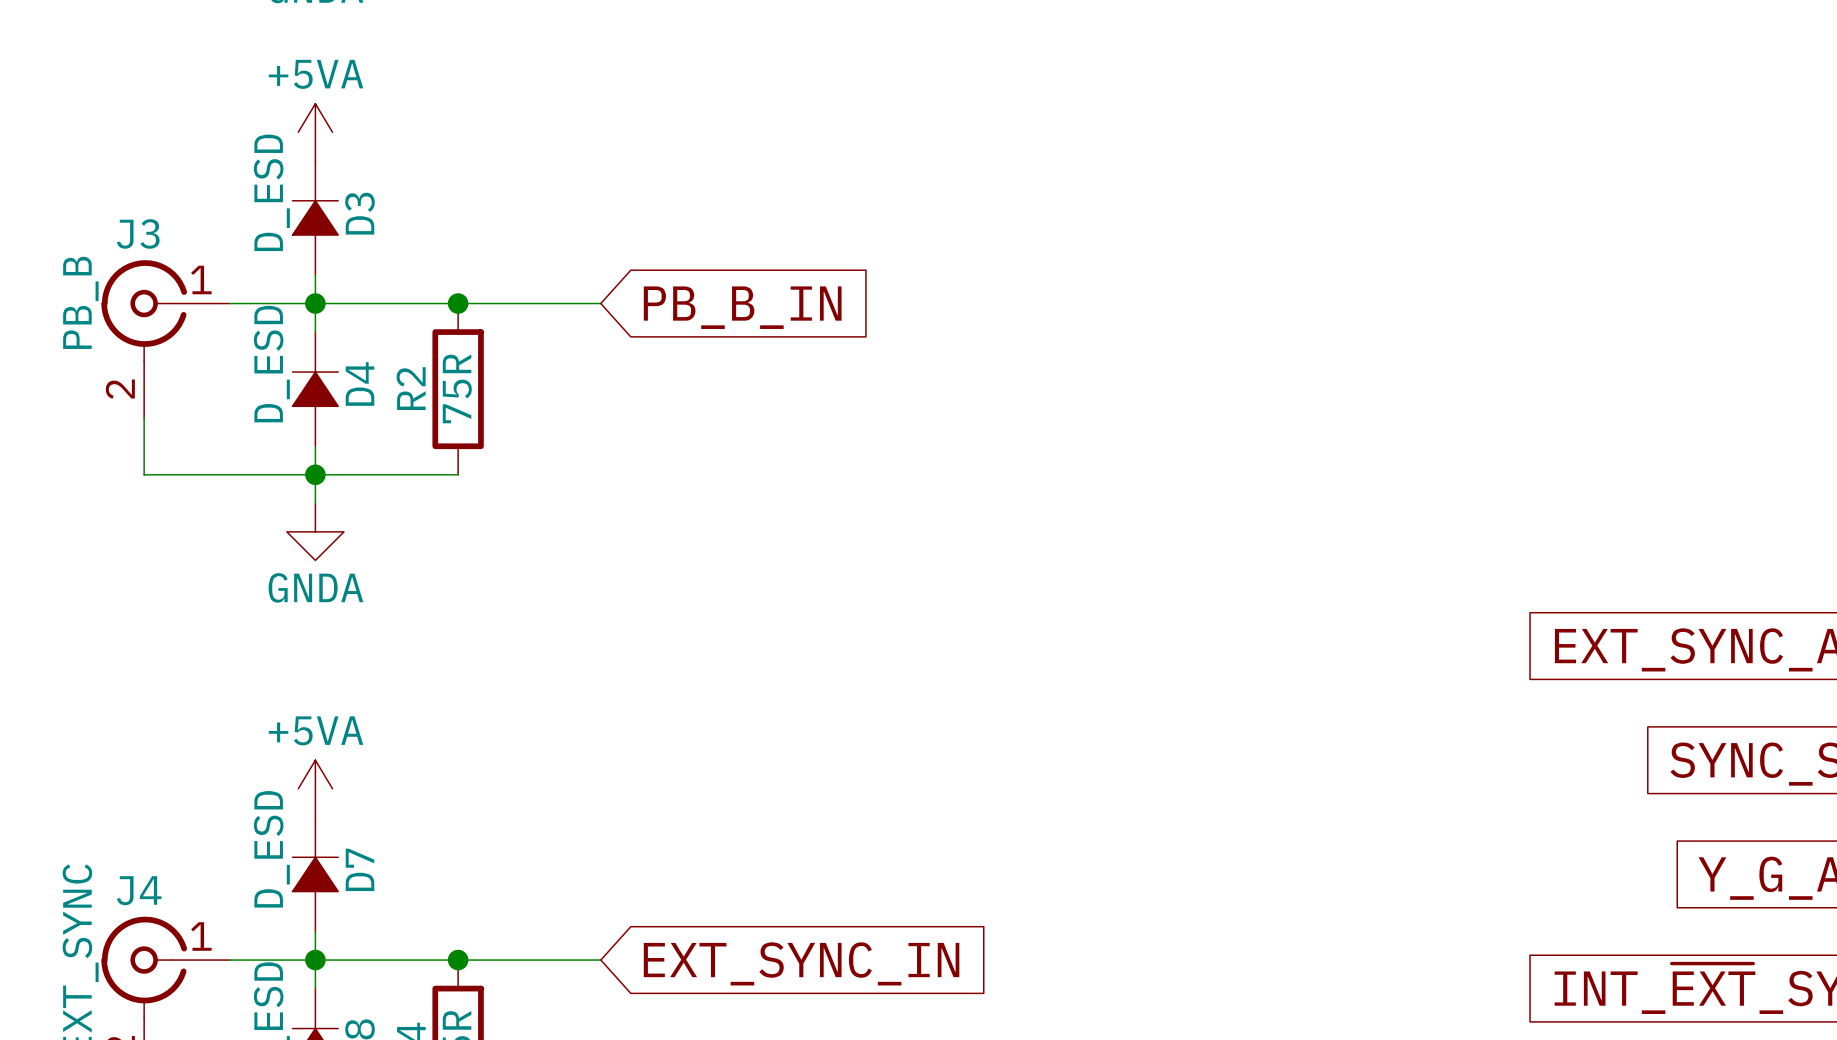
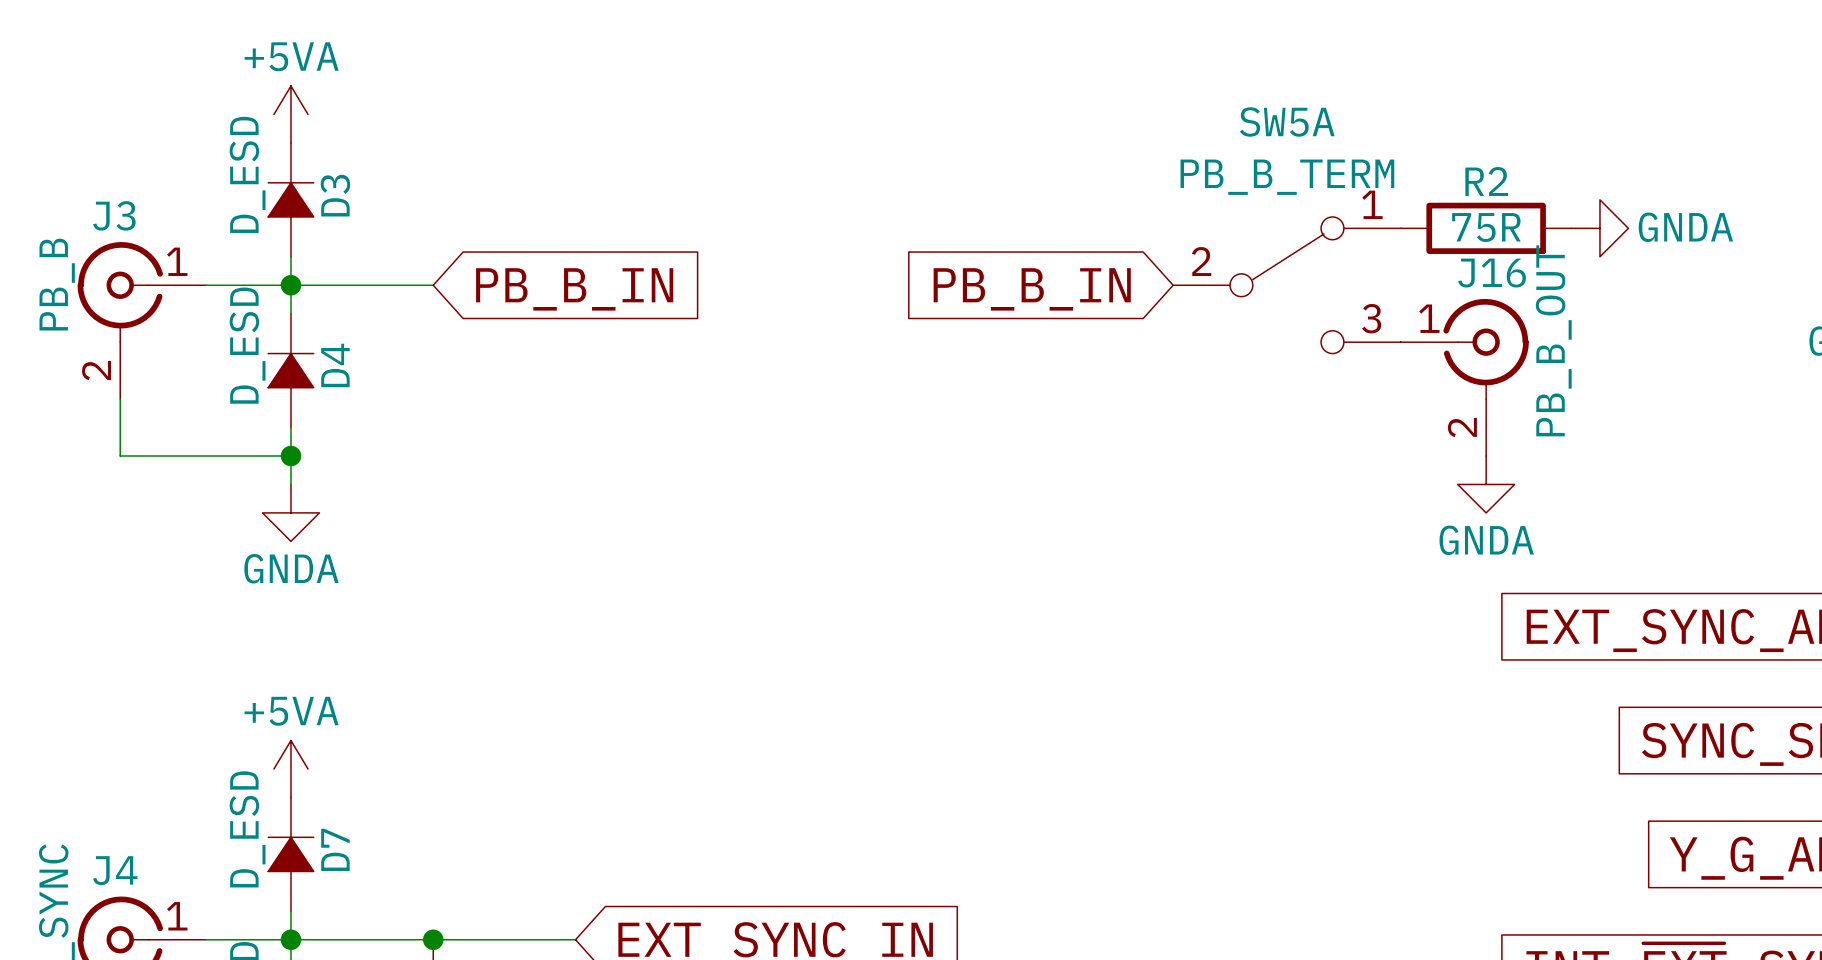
power symbol: none -> GNDA (1599, 228)
wire: (458, 303) (600, 303) -> none
junction: (458, 303) -> none
SW5A: none -> PB_B_TERM (1286, 285)
global label position: PB_B_IN (742, 307) -> PB_B_IN (574, 289)
global label: none -> PB_B_IN (1032, 289)
R2 rotation: 0° (458, 389) -> 90° clockwise (1486, 228)
R2 position: (458, 389) -> (1486, 228)
J16: none -> PB_B_OUT (1464, 377)
wire: (315, 474) (458, 474) -> none
power symbol: none -> GNDA (1486, 484)

